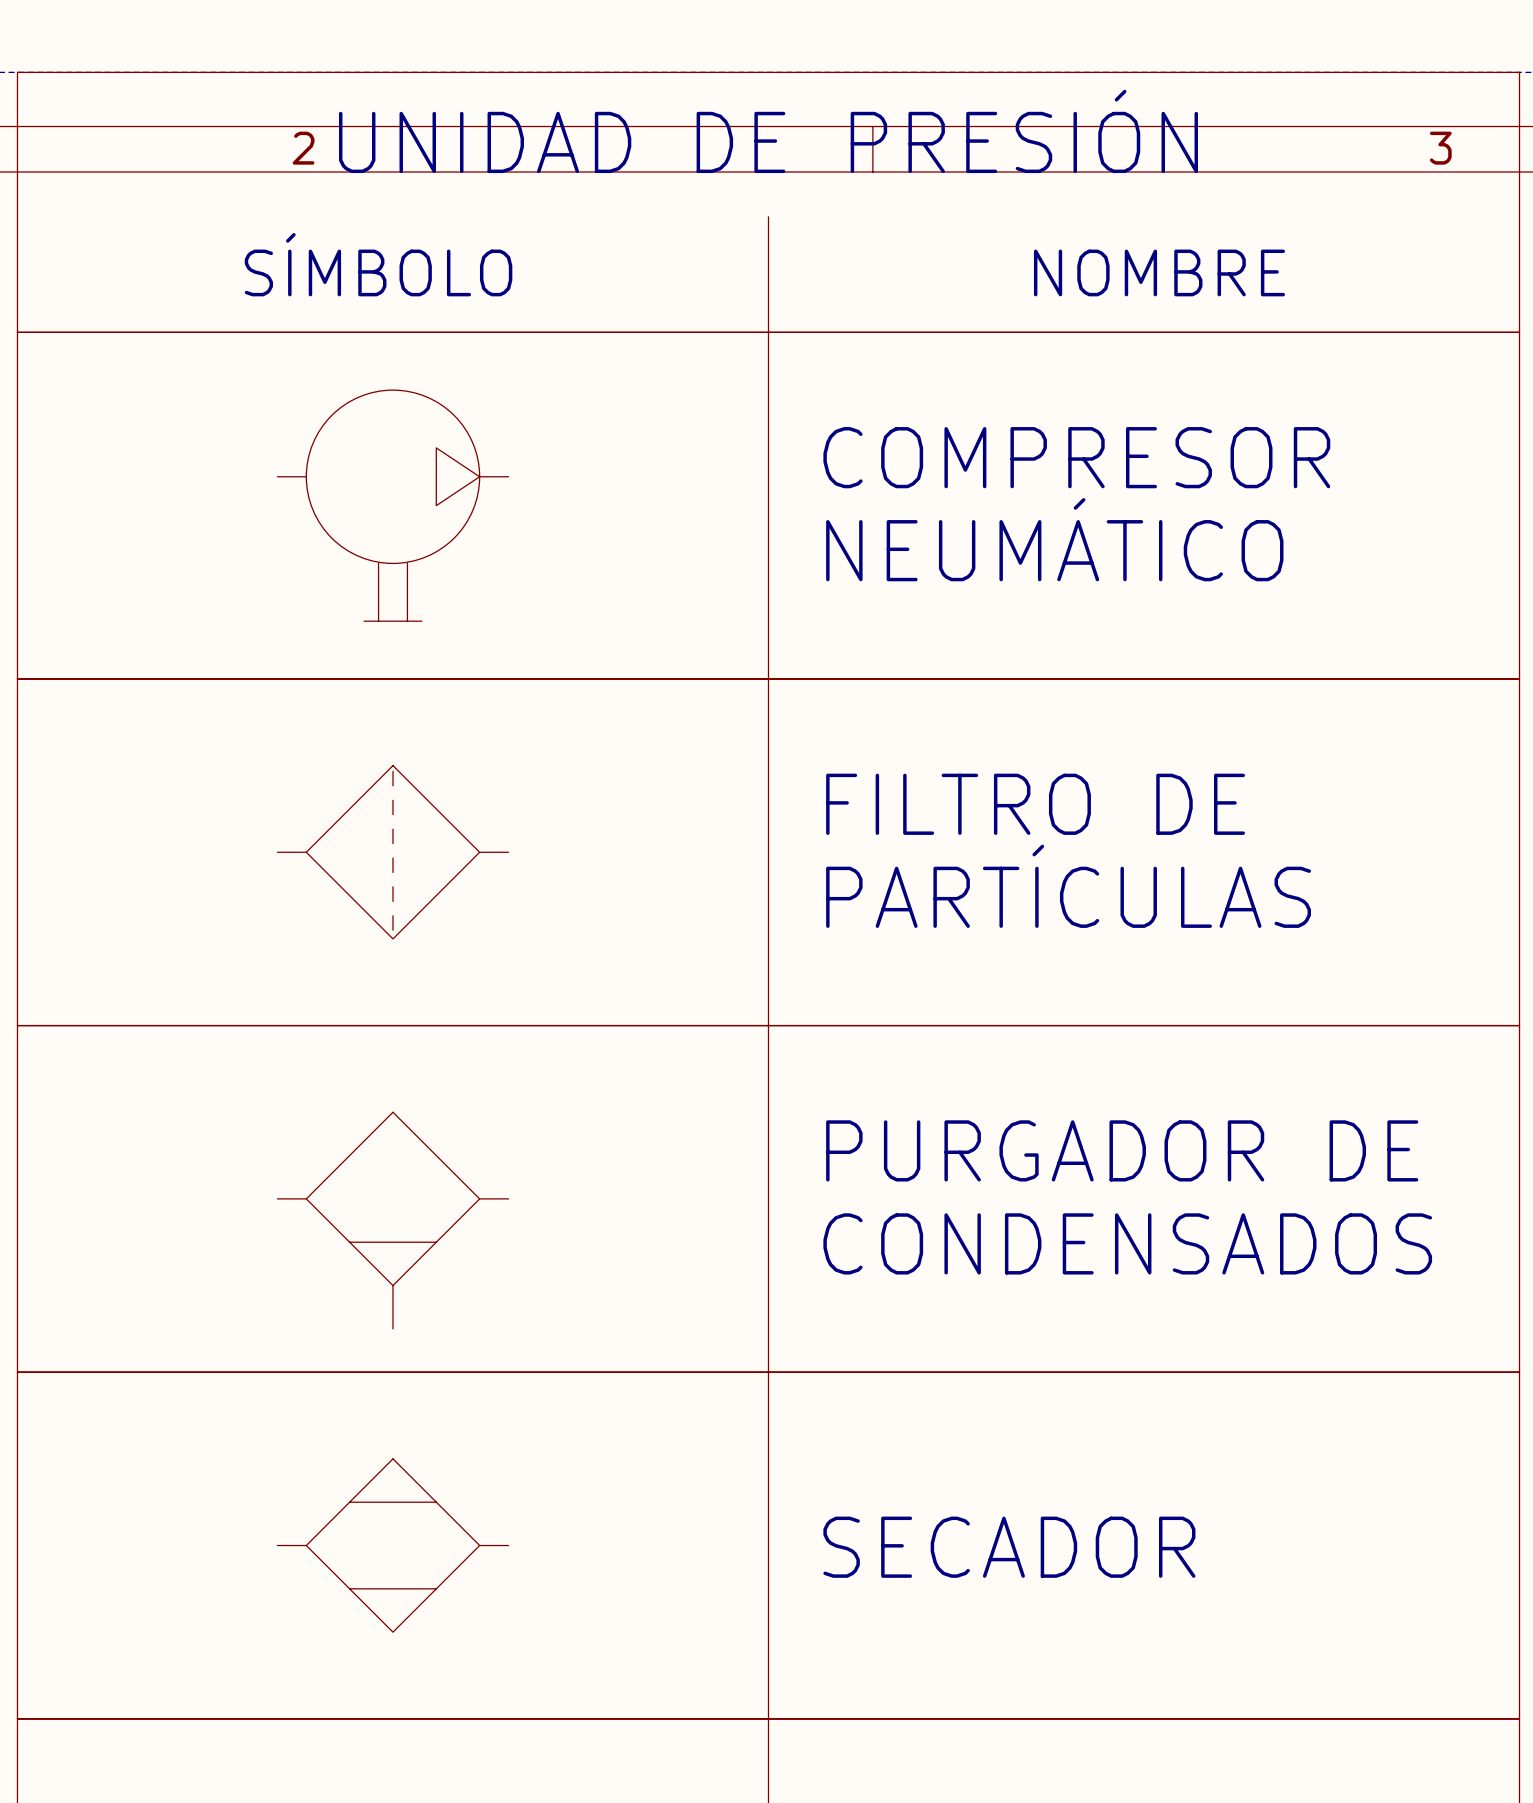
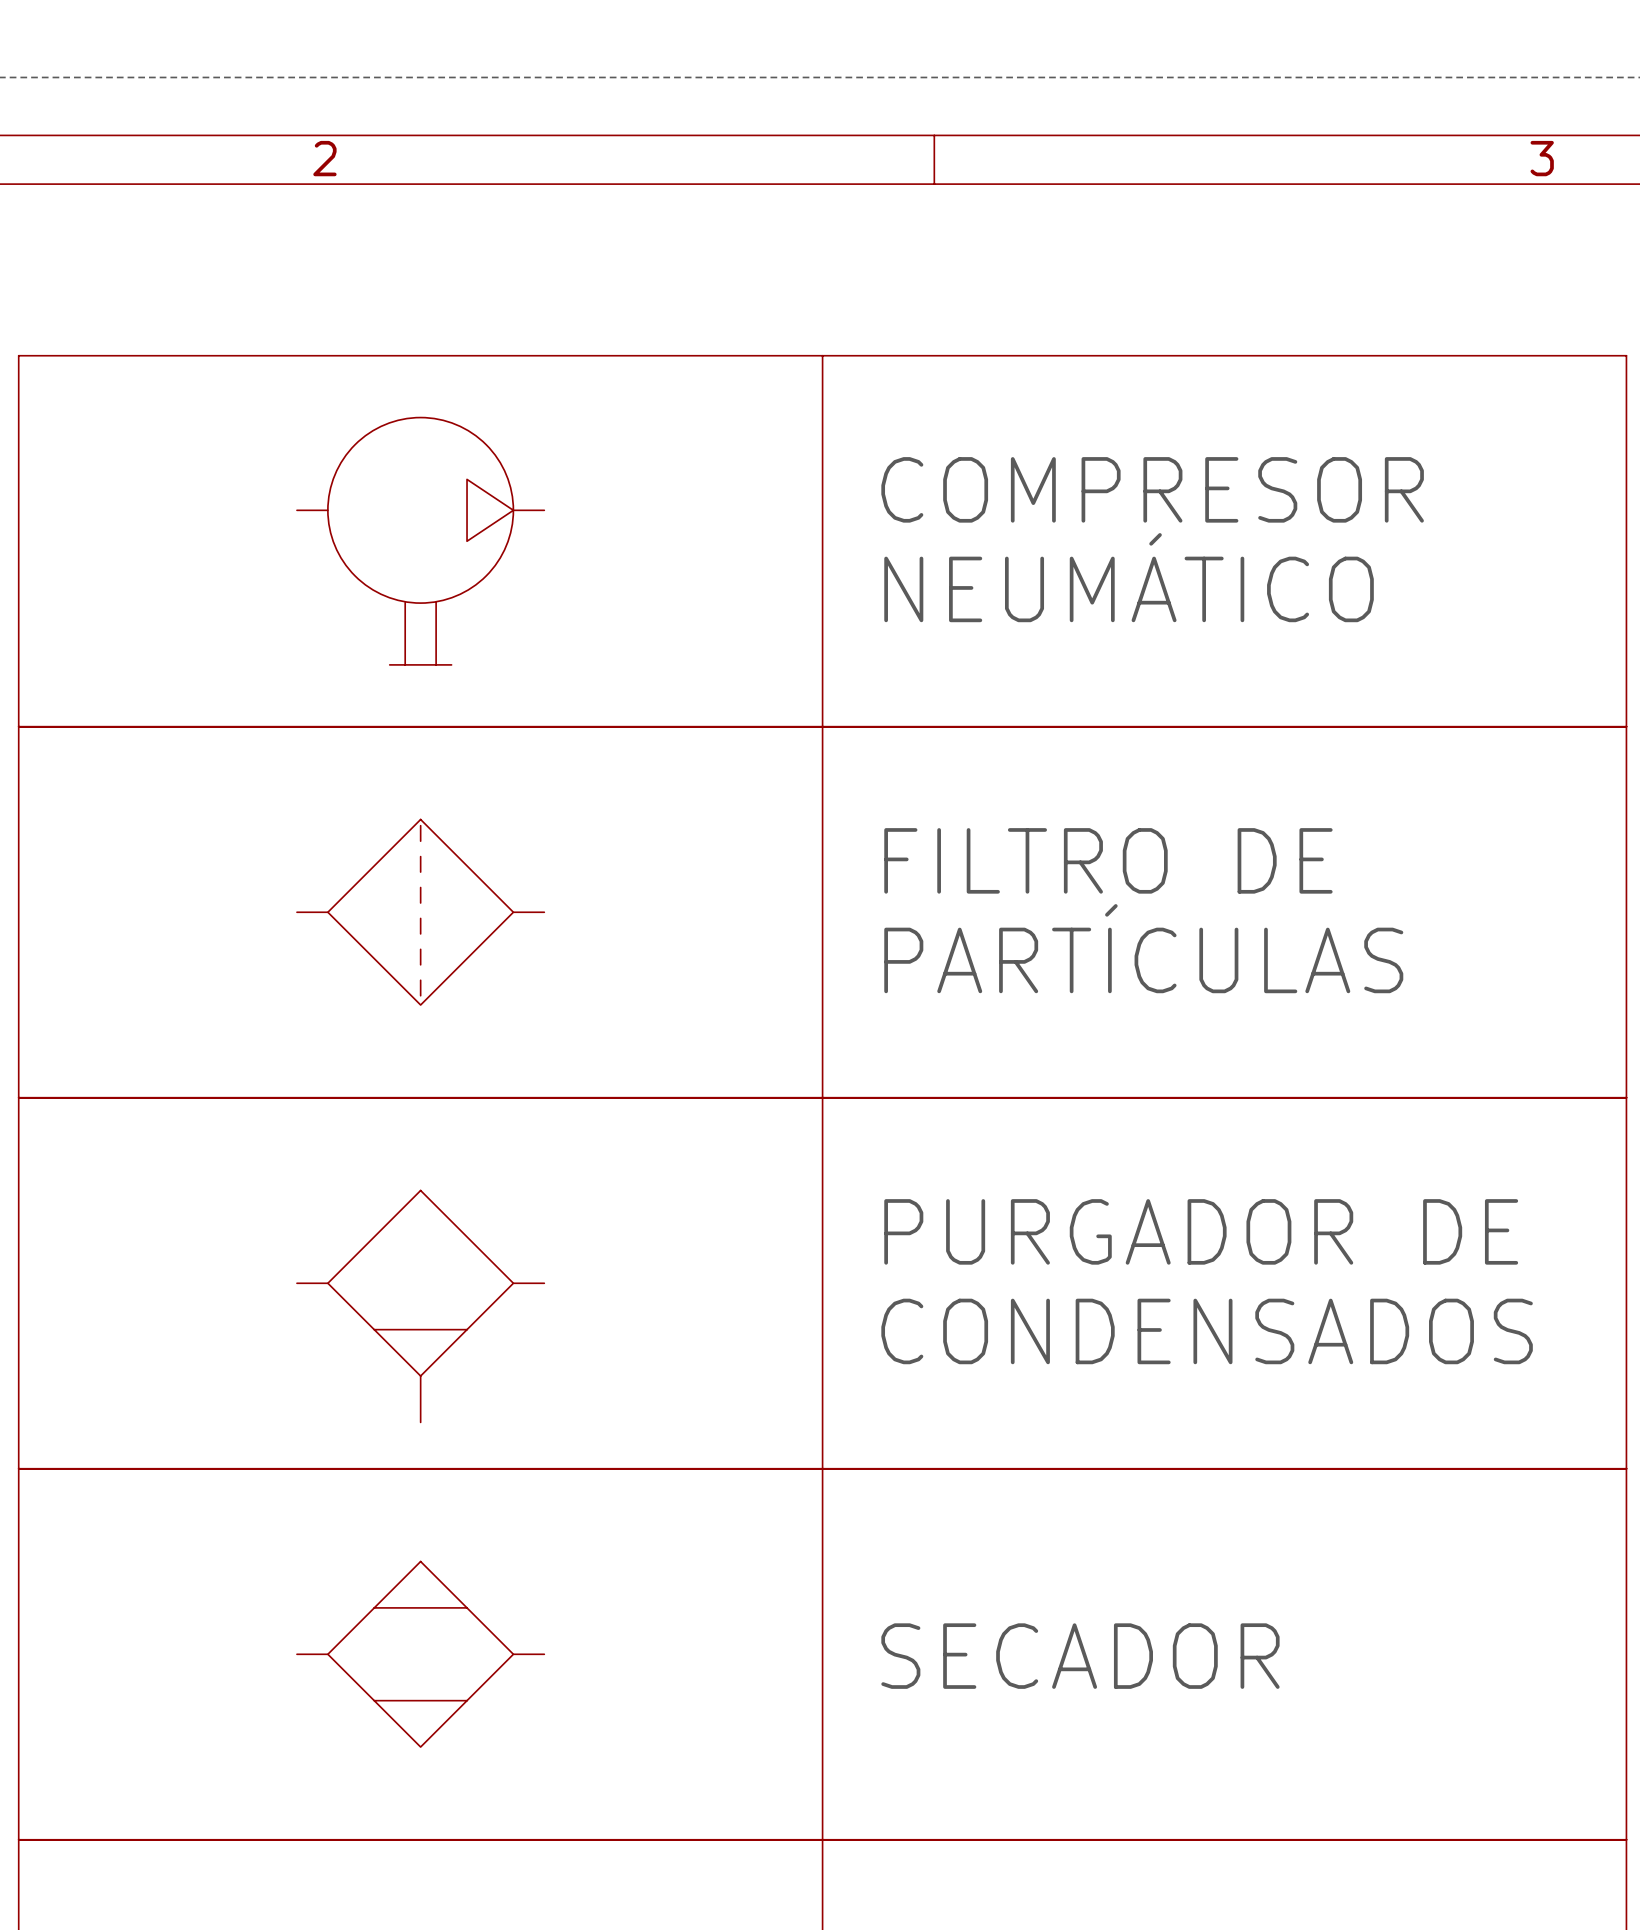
part: (768, 202) -> none

